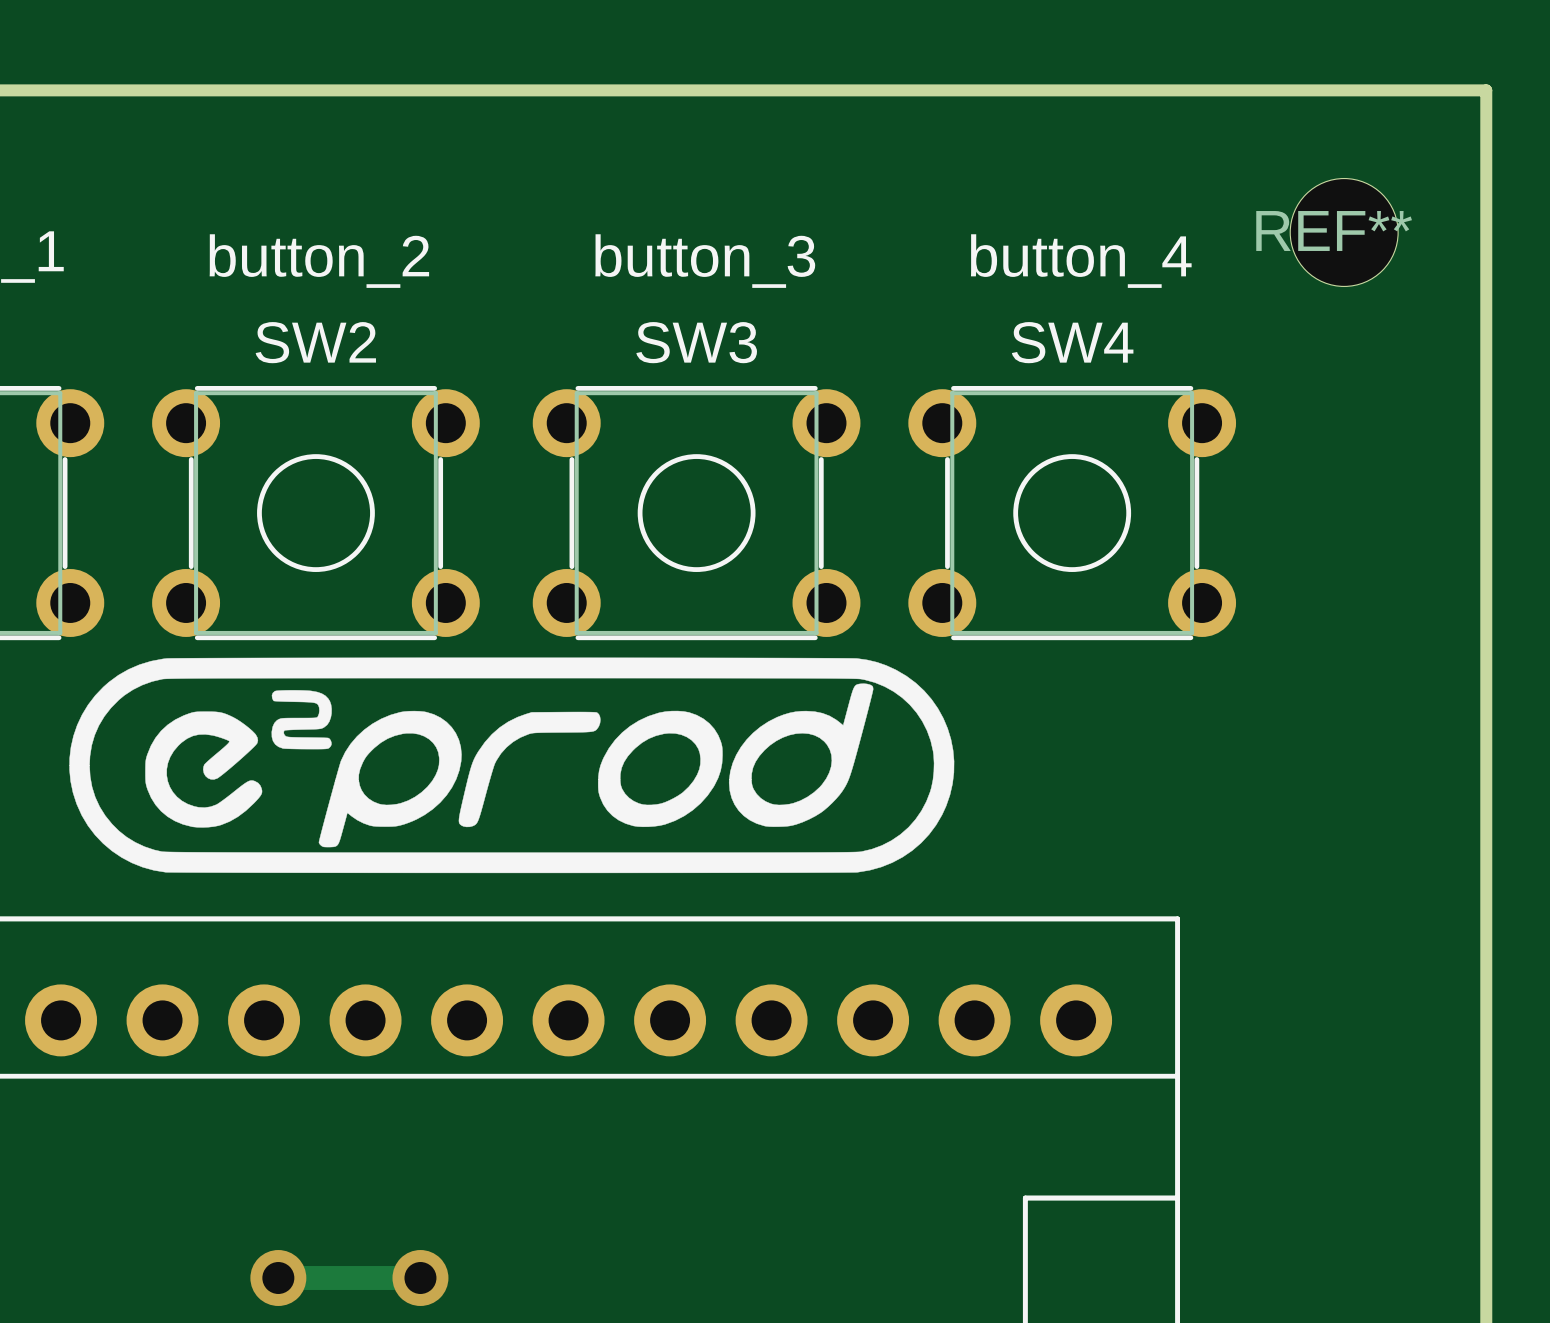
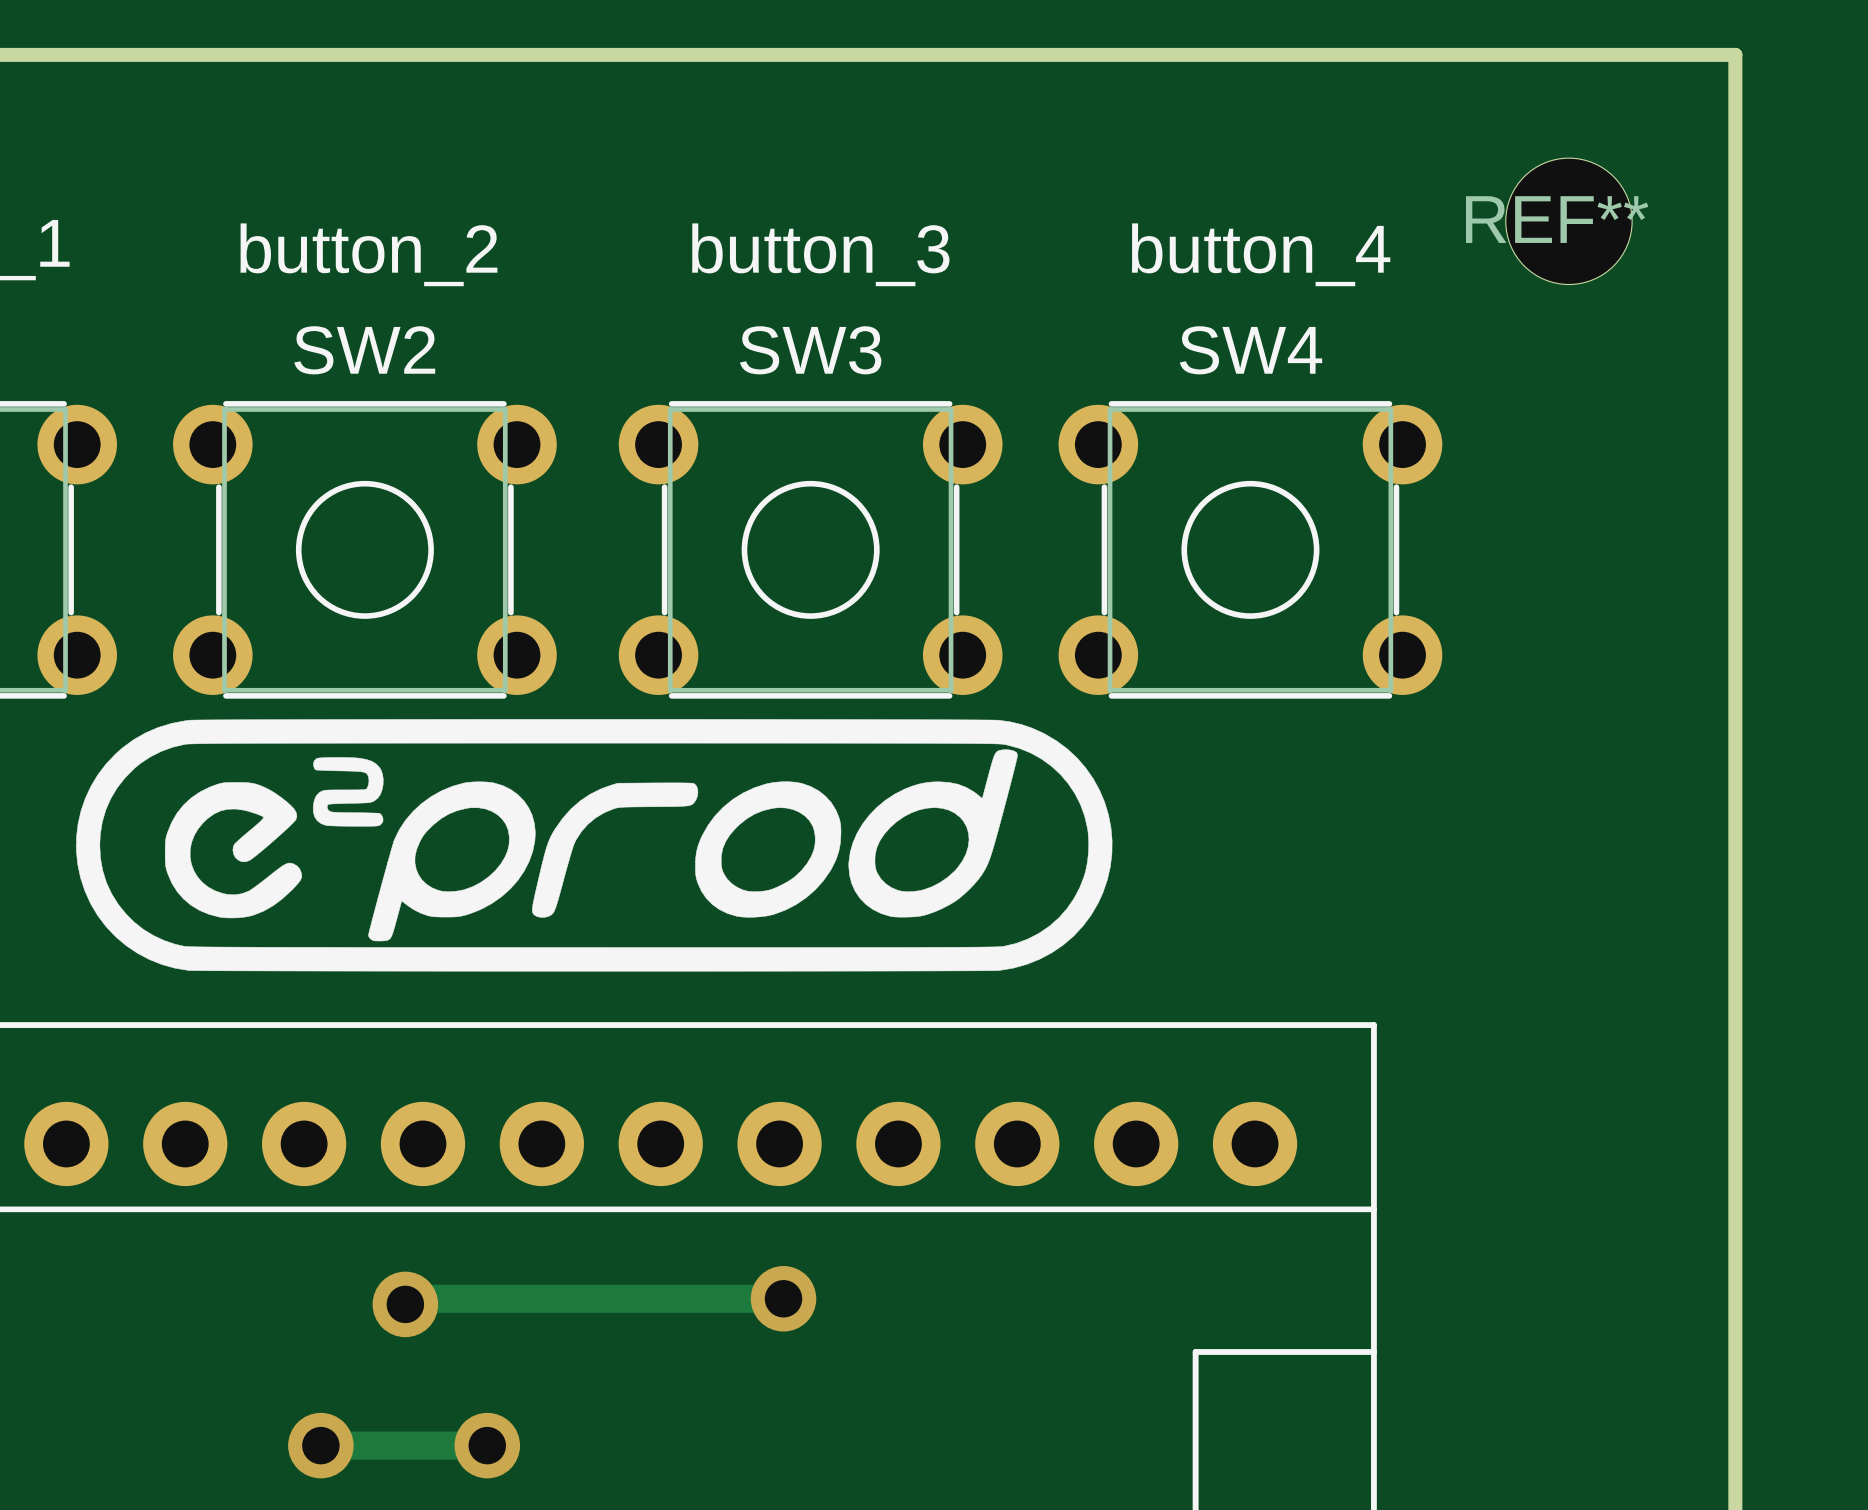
track: none -> (783, 1298) (411, 1298) (405, 1304)
via: none -> (783, 1298)
via: none -> (405, 1304)

